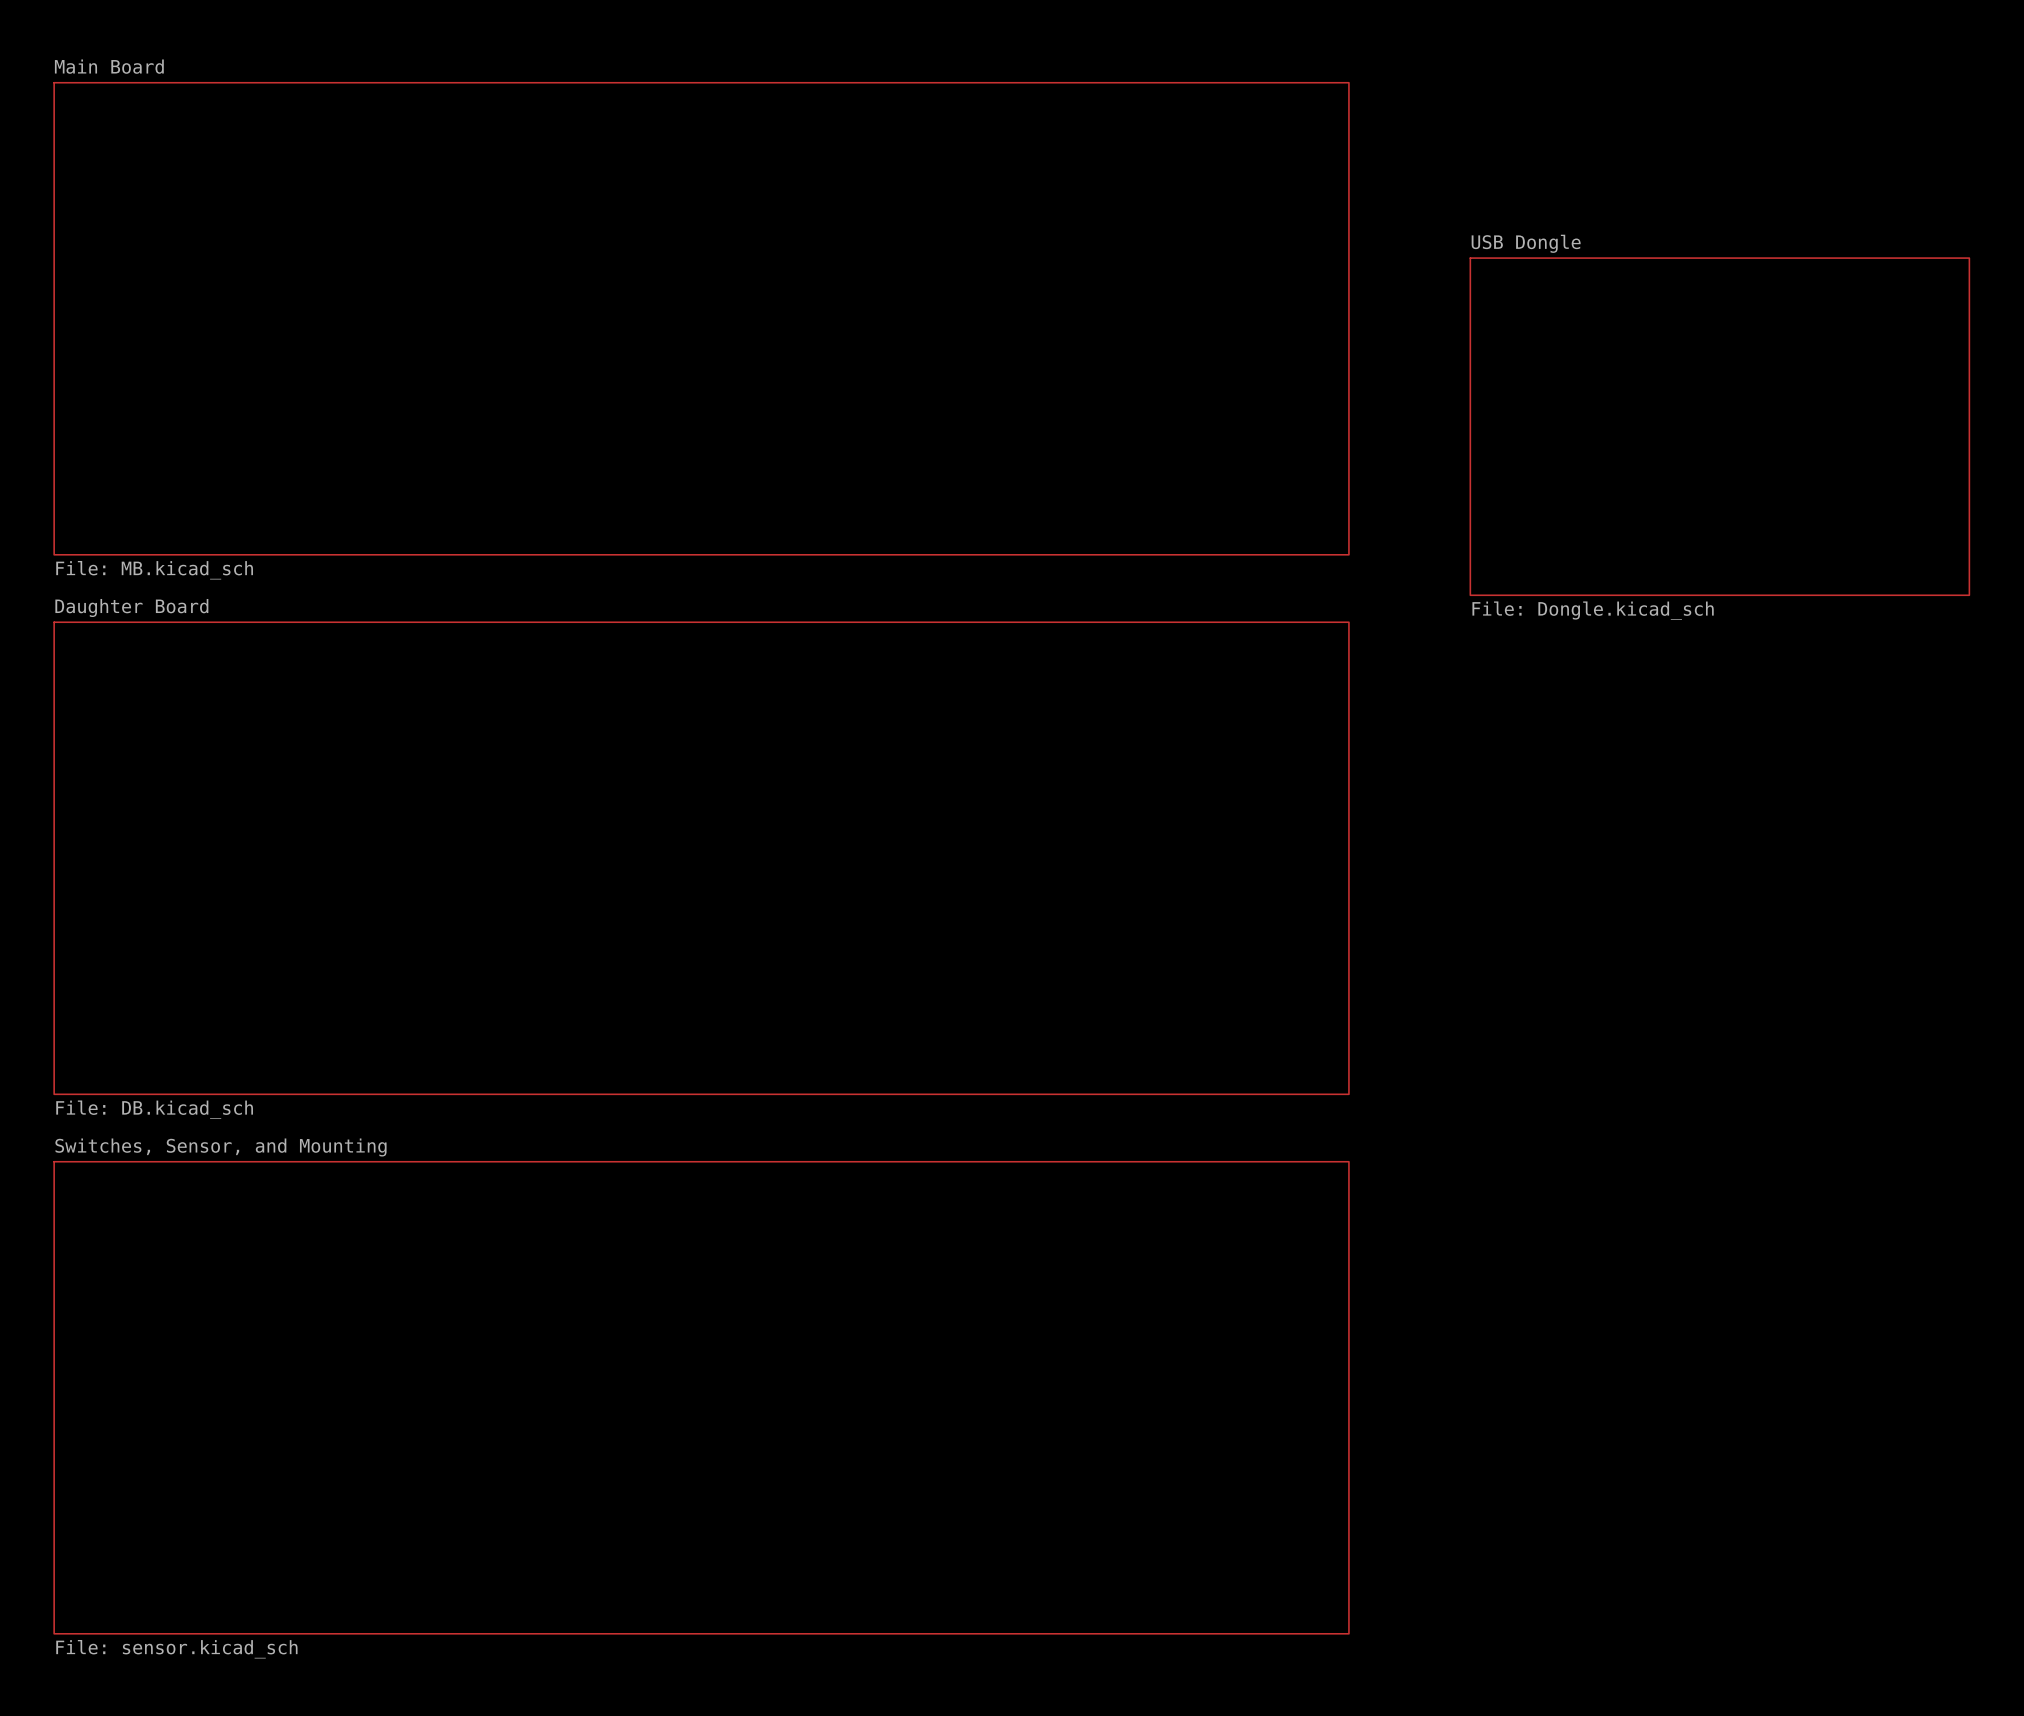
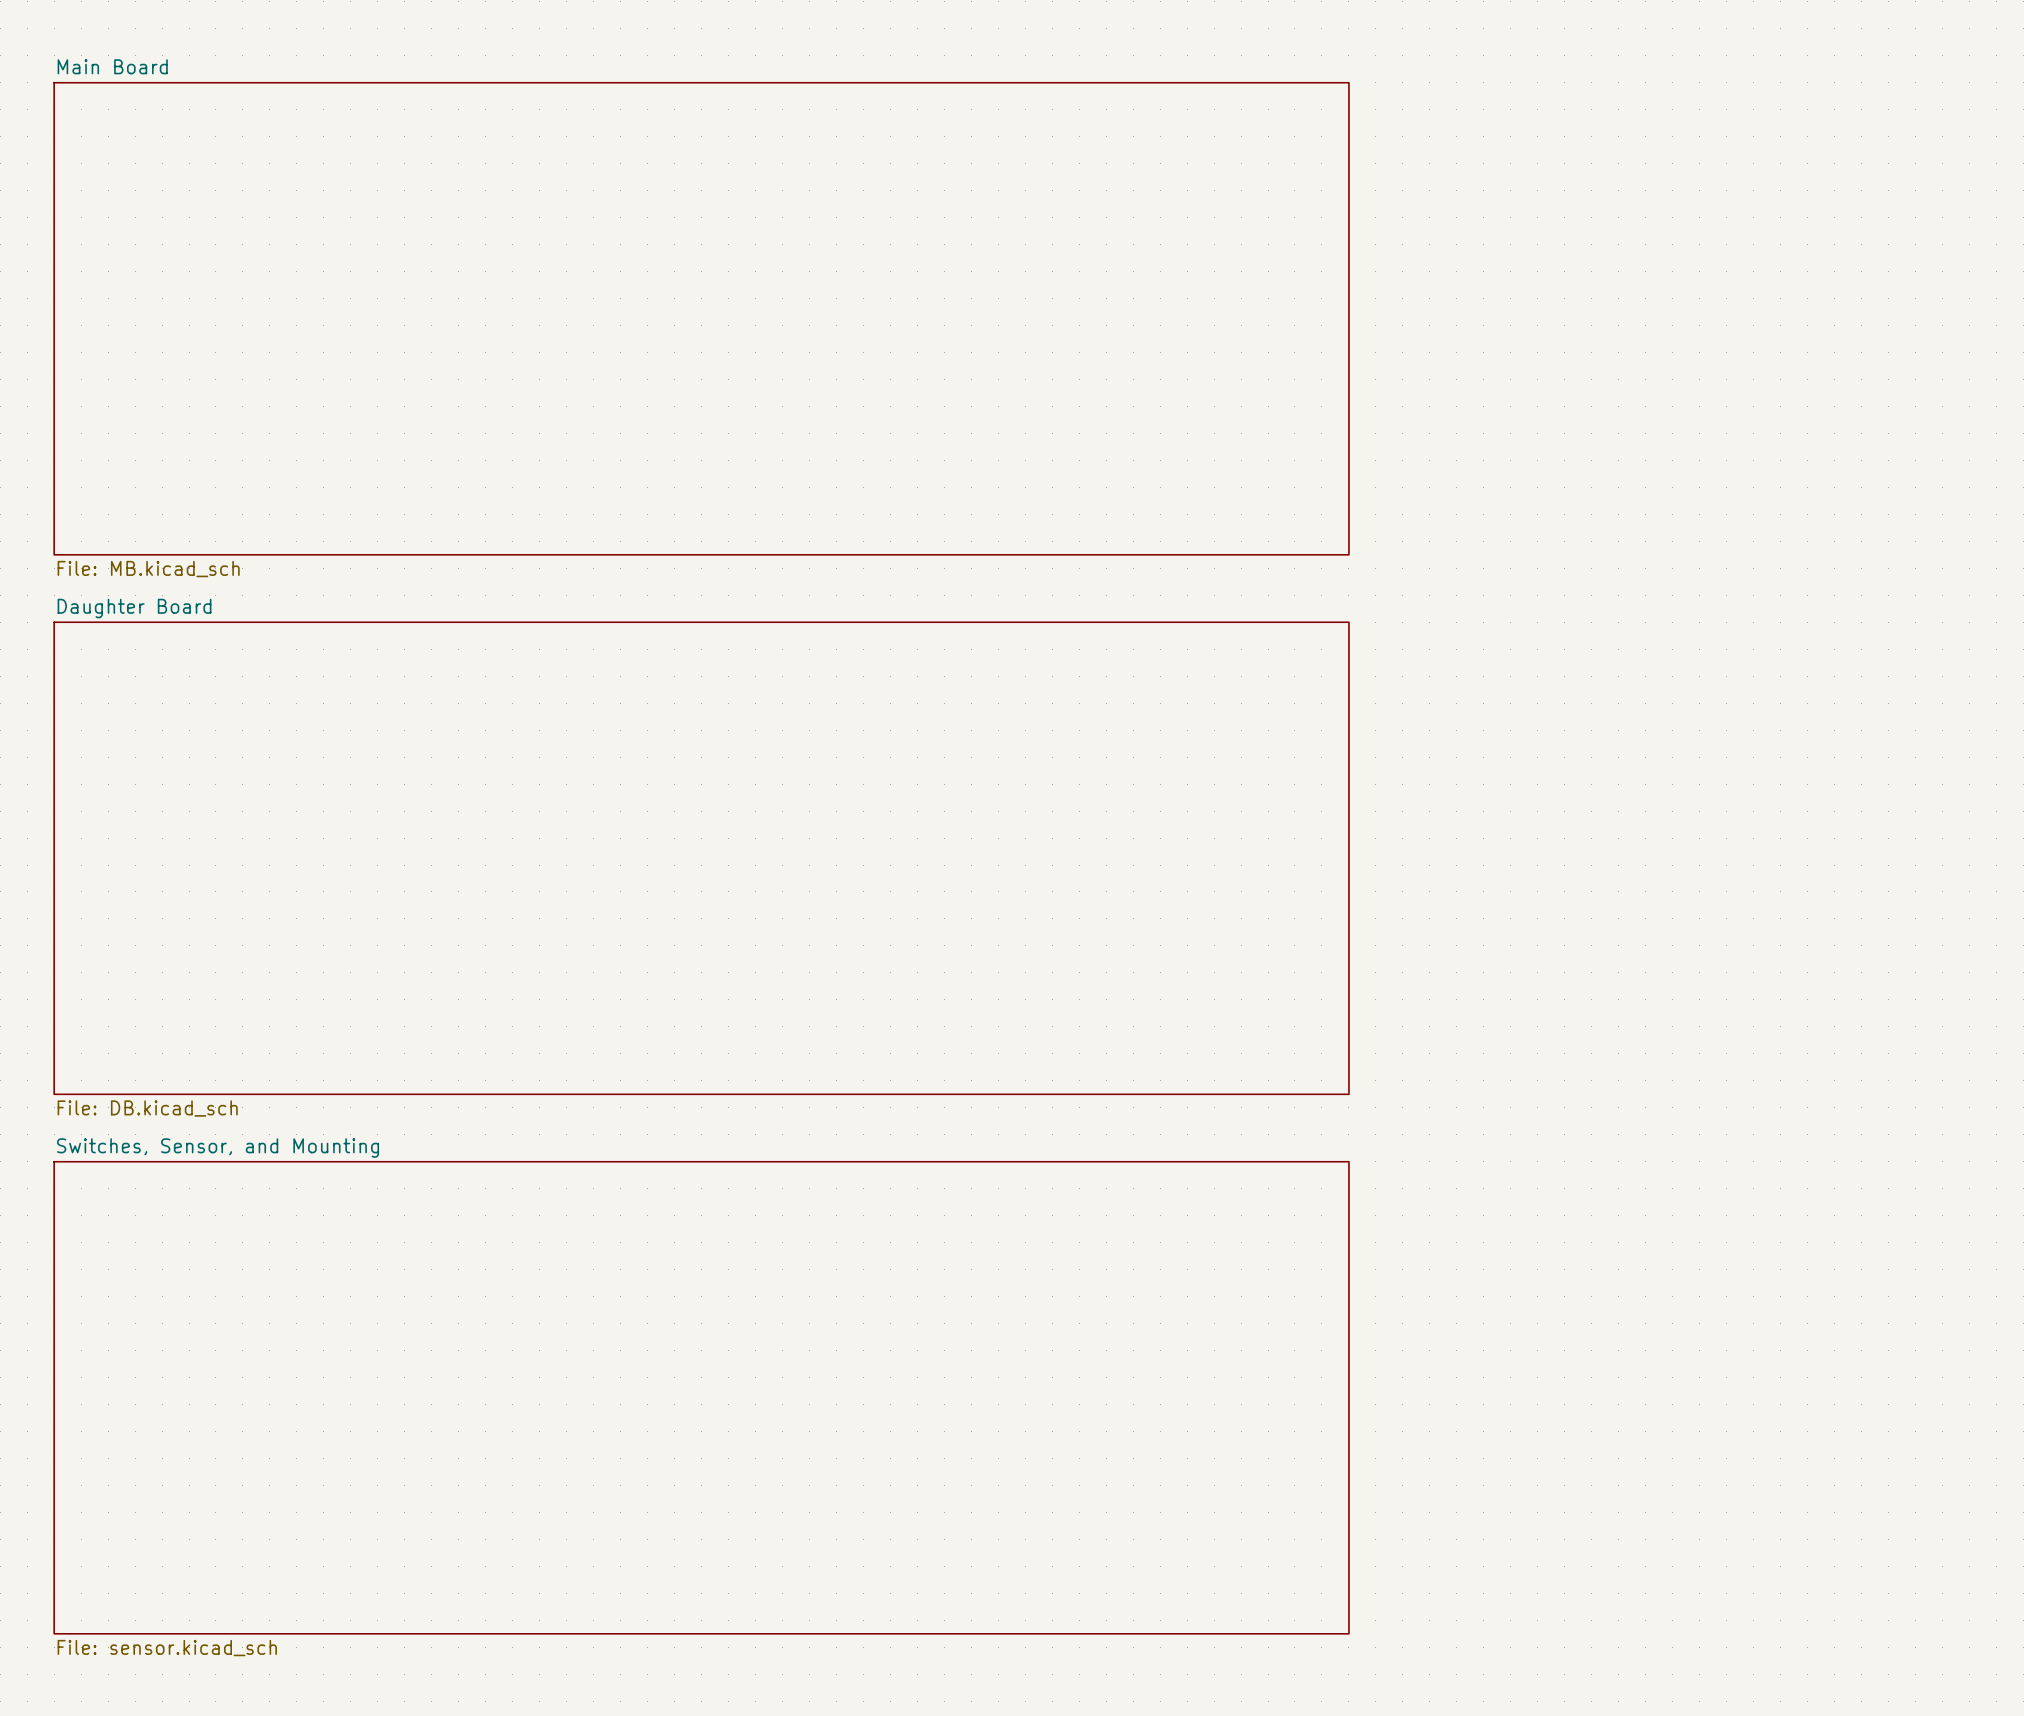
sheet USB Dongle: File: Dongle.kicad_sch (1719, 426) -> none

